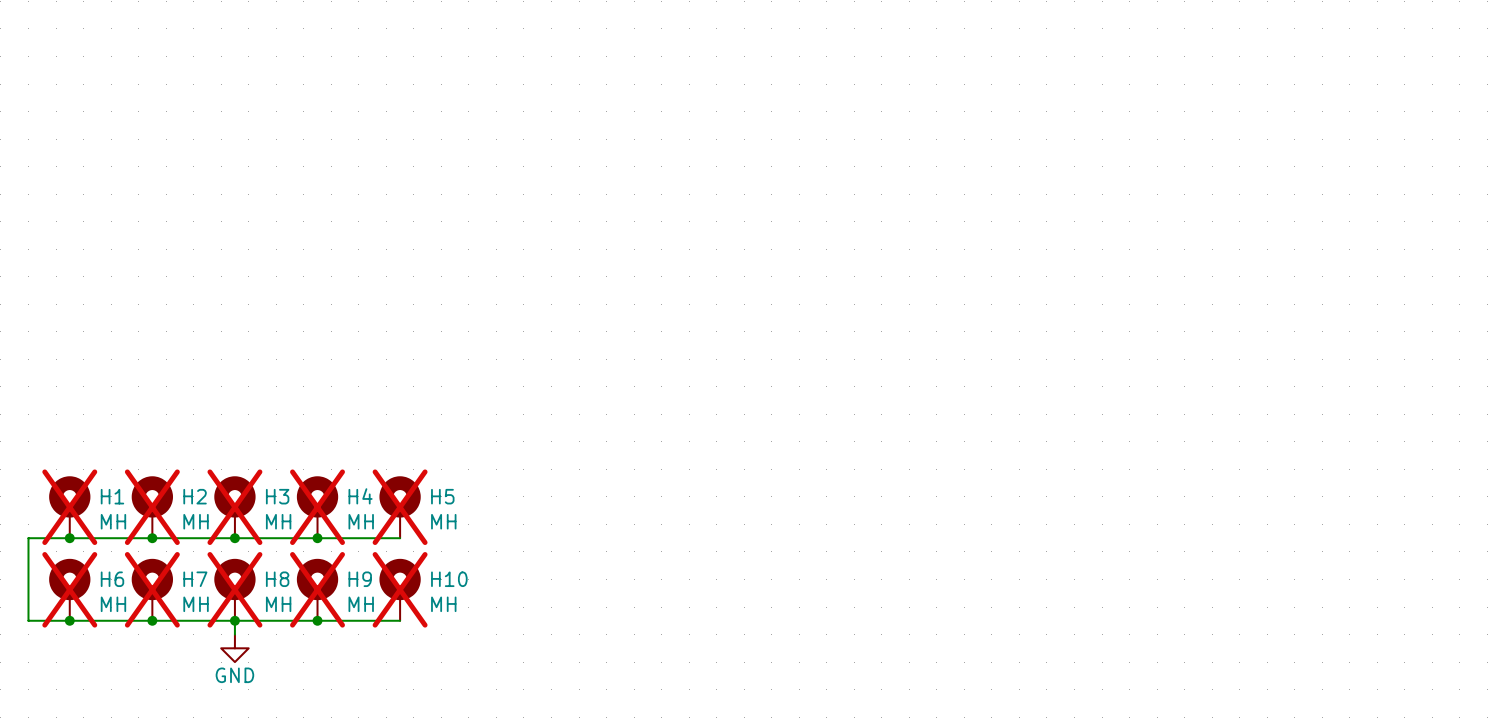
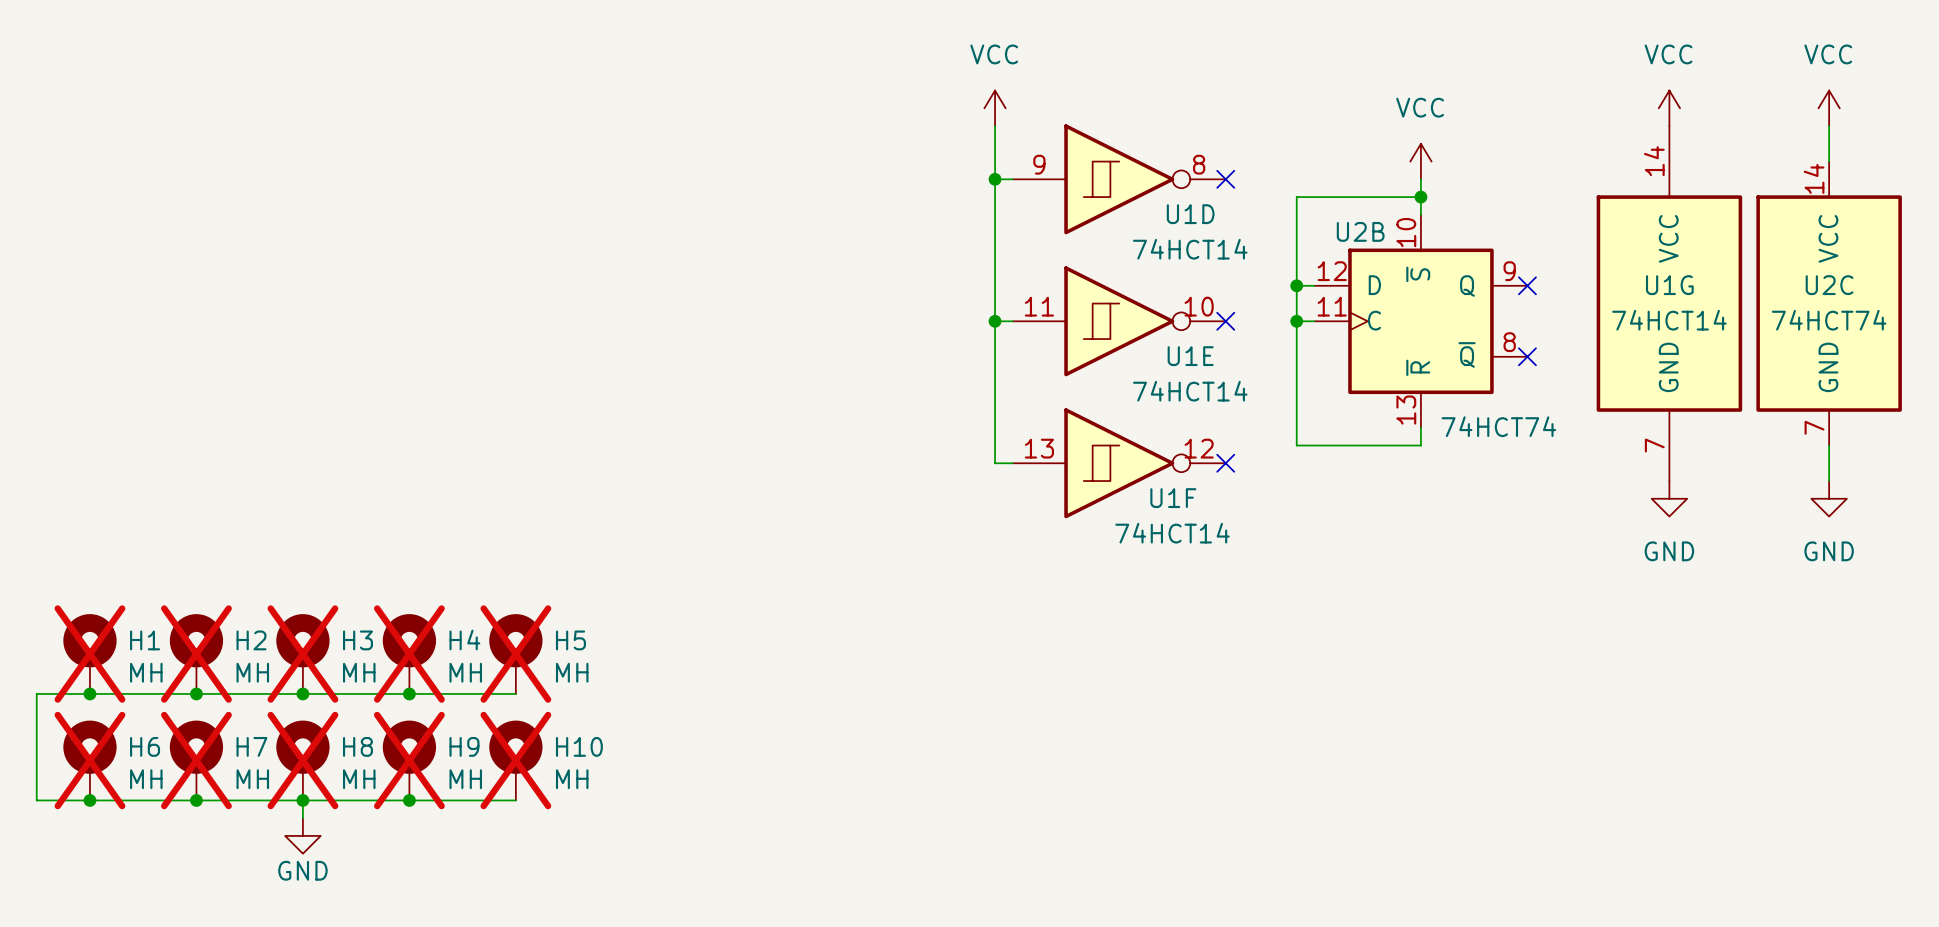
power symbol: none -> VCC (995, 108)
power symbol: none -> VCC (1669, 108)
power symbol: none -> VCC (1829, 108)
wire: none -> (995, 126) (995, 463) (1012, 463)
wire: none -> (1829, 126) (1829, 161)
power symbol: none -> VCC (1420, 161)
wire: none -> (995, 179) (1012, 179)
junction: none -> (995, 179)
U1D: none -> 74HCT14 (1119, 179)
no-connect mark: none -> (1225, 179)
wire: none -> (1420, 179) (1420, 214)
wire: none -> (1420, 197) (1296, 197) (1296, 445) (1420, 445) (1420, 427)
junction: none -> (1420, 197)
wire: none -> (1296, 285) (1314, 285)
junction: none -> (1296, 285)
no-connect mark: none -> (1527, 285)
U1G: none -> 74HCT14 (1669, 303)
U2C: none -> 74HCT74 (1829, 303)
wire: none -> (995, 321) (1012, 321)
junction: none -> (995, 321)
U1E: none -> 74HCT14 (1119, 321)
no-connect mark: none -> (1225, 321)
wire: none -> (1296, 321) (1314, 321)
junction: none -> (1296, 321)
U2B: none -> 74HCT74 (1420, 321)
no-connect mark: none -> (1527, 356)
wire: none -> (1829, 445) (1829, 481)
U1F: none -> 74HCT14 (1119, 463)
no-connect mark: none -> (1225, 463)
power symbol: none -> GND (1669, 498)
power symbol: none -> GND (1829, 498)

